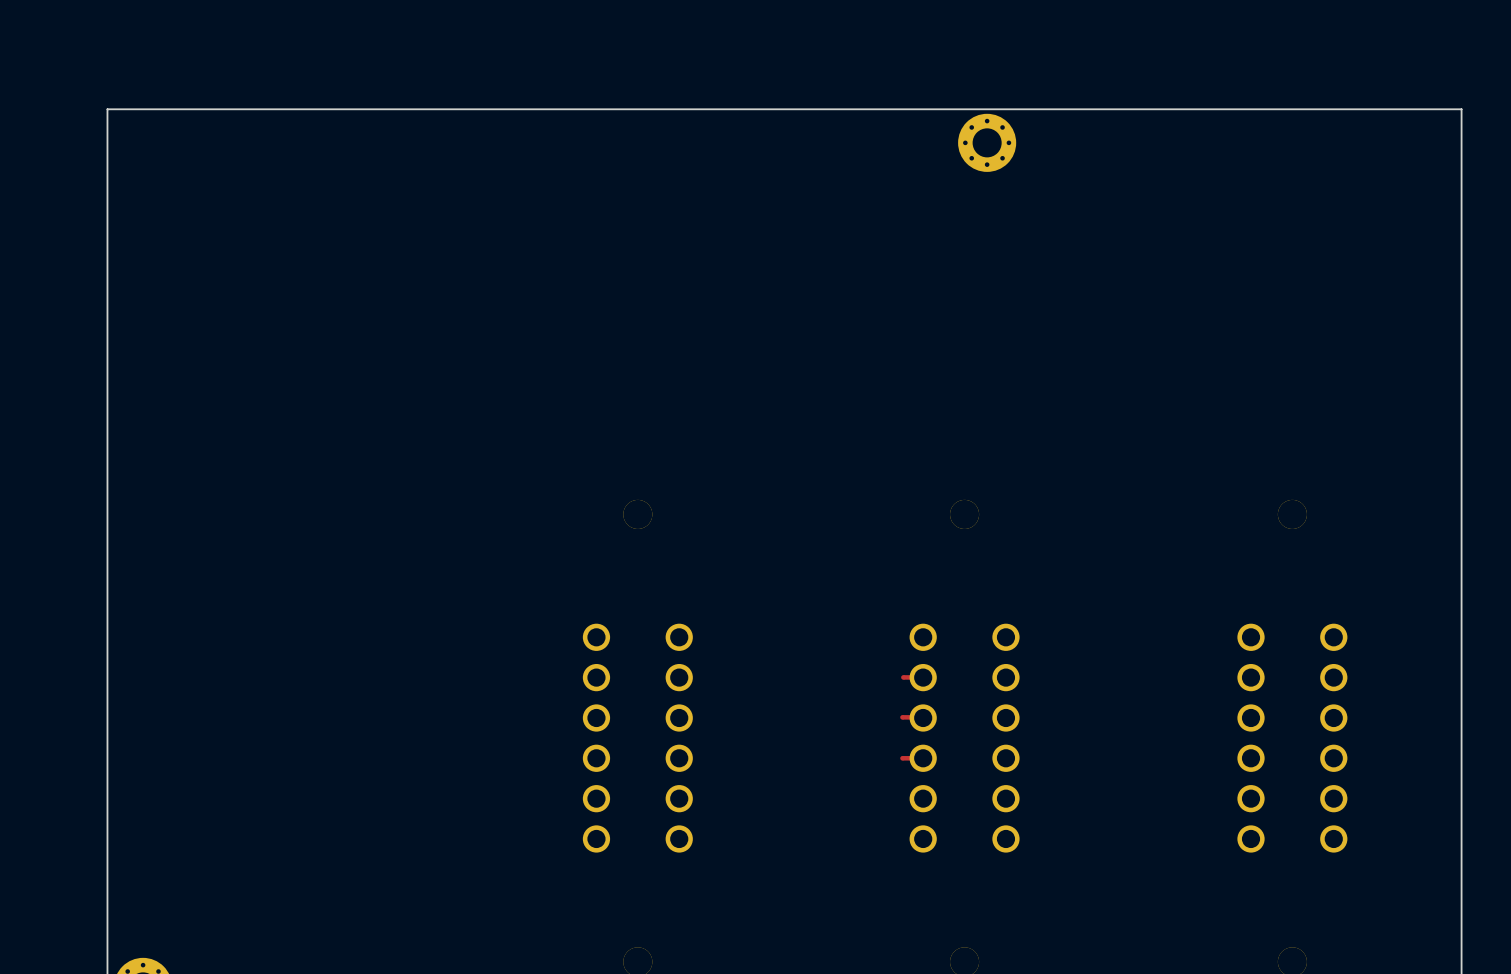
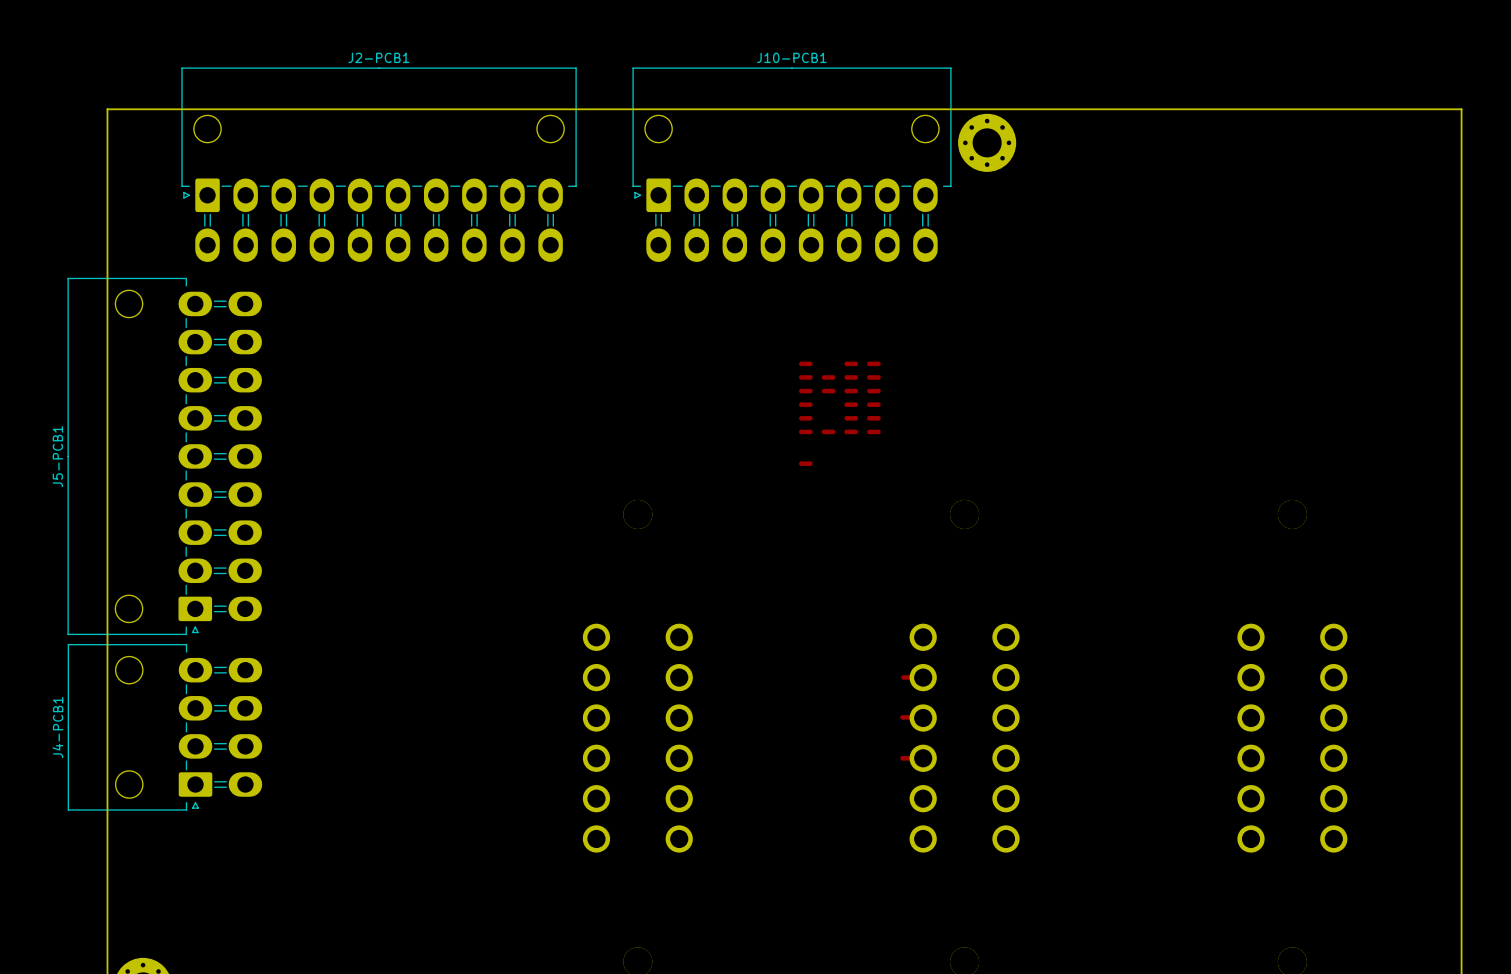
J2-PCB1: none -> (379, 164)
J10-PCB1: none -> (792, 164)
part: none -> (805, 363)
part: none -> (851, 363)
part: none -> (873, 363)
part: none -> (805, 377)
part: none -> (828, 377)
part: none -> (851, 377)
part: none -> (873, 377)
part: none -> (805, 391)
part: none -> (828, 391)
part: none -> (851, 391)
part: none -> (873, 391)
part: none -> (805, 404)
part: none -> (851, 404)
part: none -> (873, 404)
part: none -> (805, 418)
part: none -> (851, 418)
part: none -> (873, 418)
part: none -> (805, 431)
part: none -> (828, 431)
part: none -> (851, 431)
part: none -> (873, 431)
J5-PCB1: none -> (164, 456)
part: none -> (805, 463)
J4-PCB1: none -> (165, 727)

